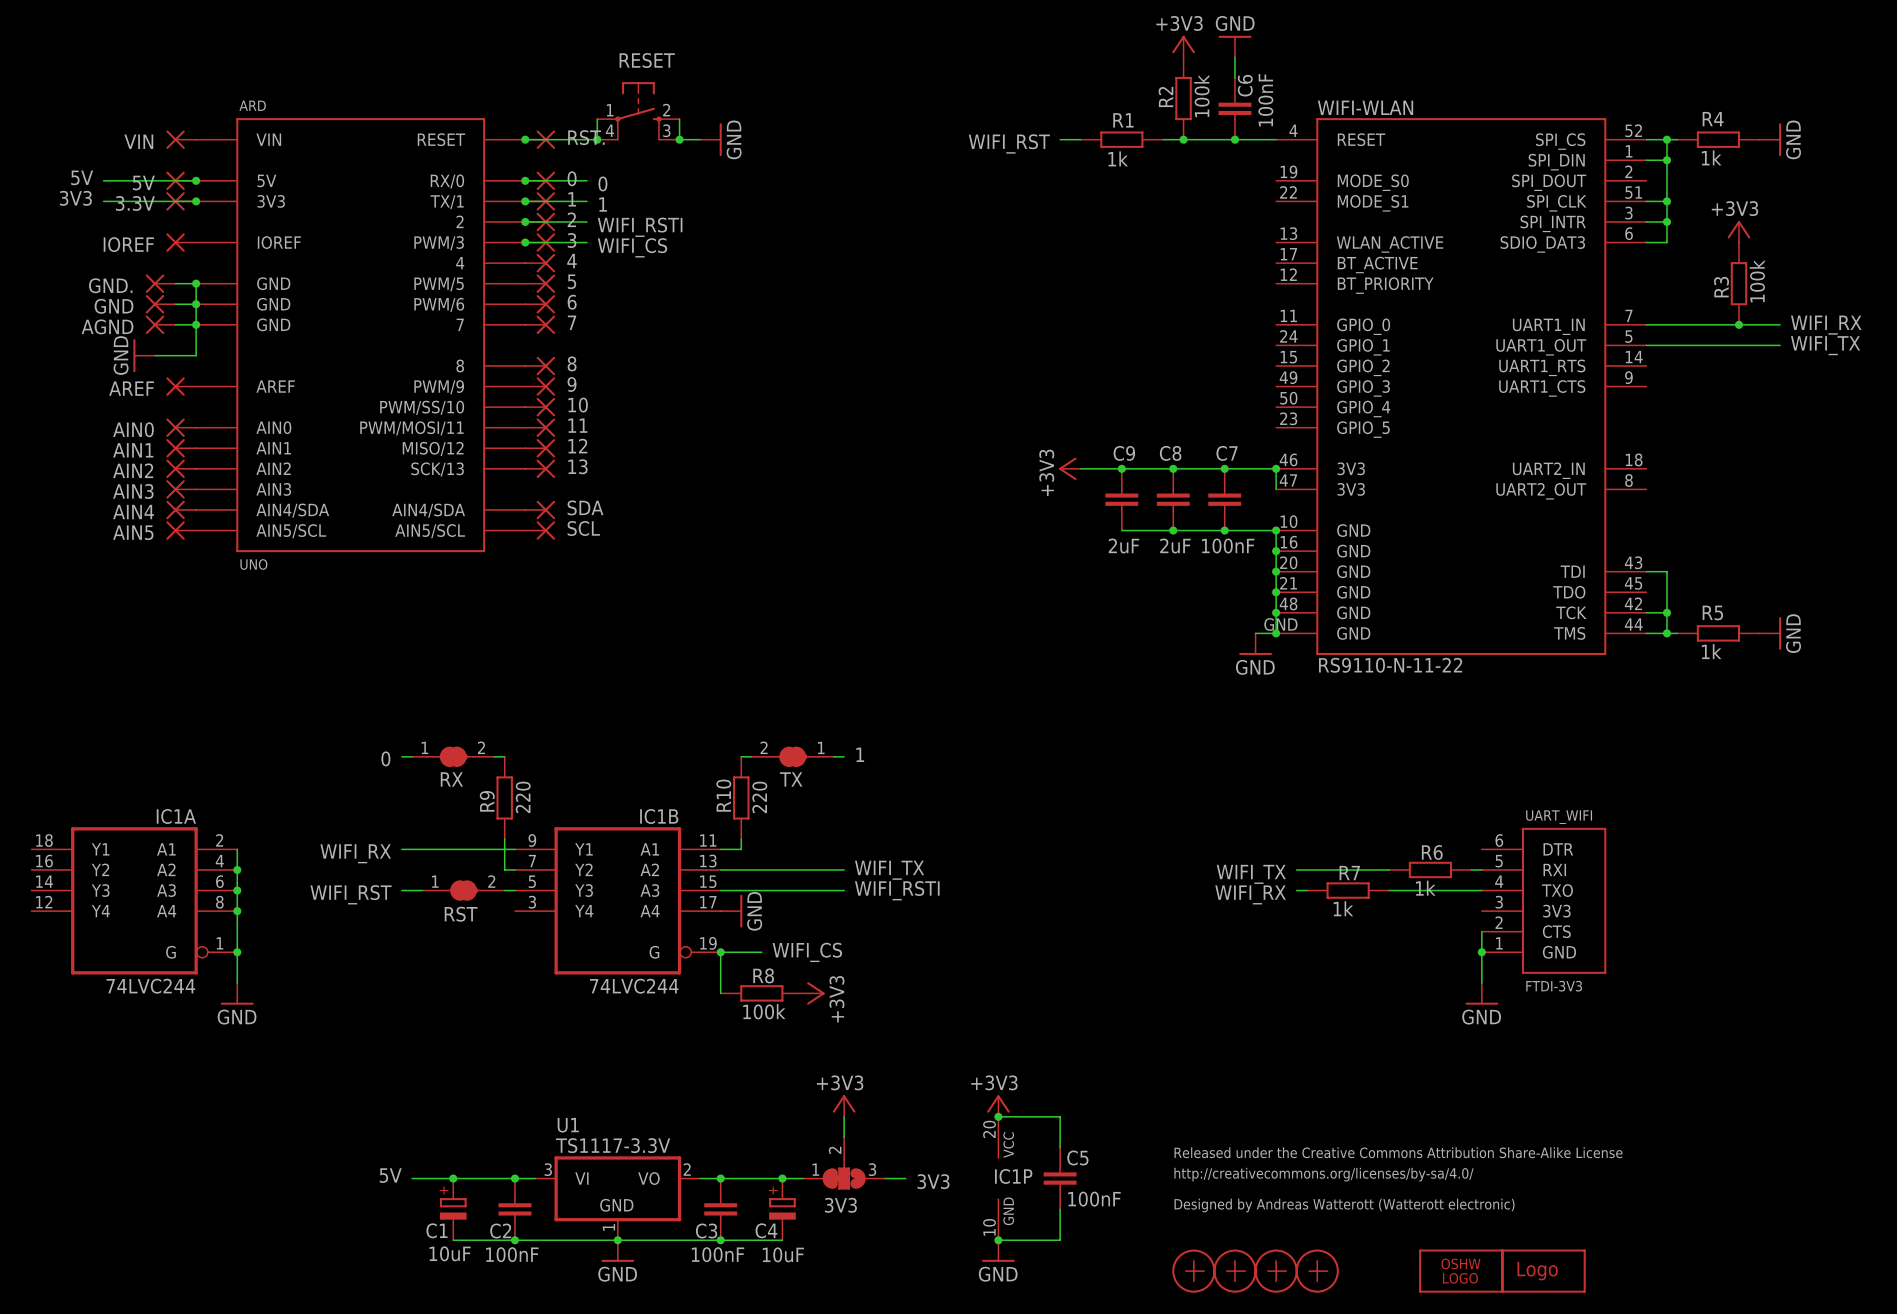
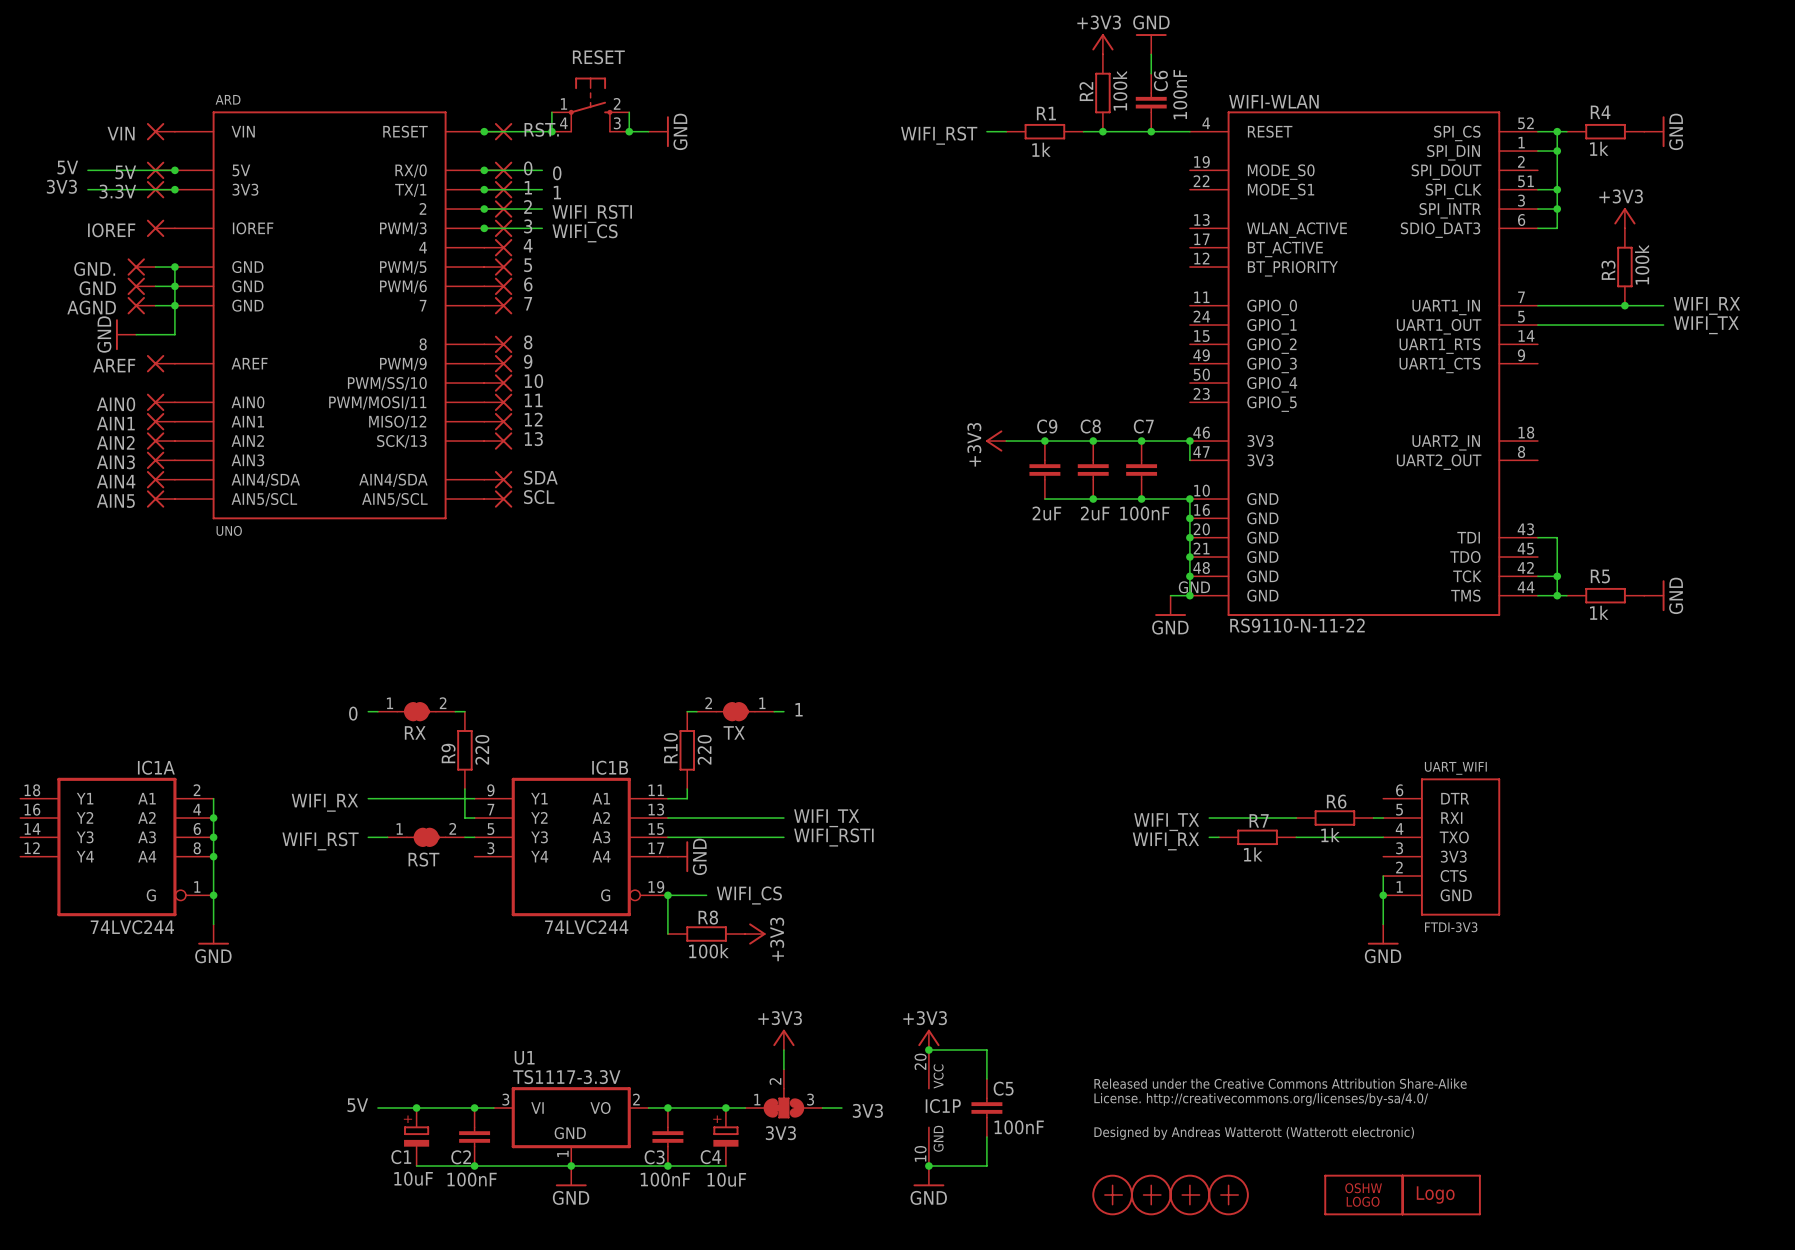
text: Released under the Creative Commons Attribution Share-Alike License (1398, 1152) -> License. http://creativecommons.org/licenses/by-sa/4.0/ (1261, 1099)
text: http://creativecommons.org/licenses/by-sa/4.0/ (1324, 1174) -> none

